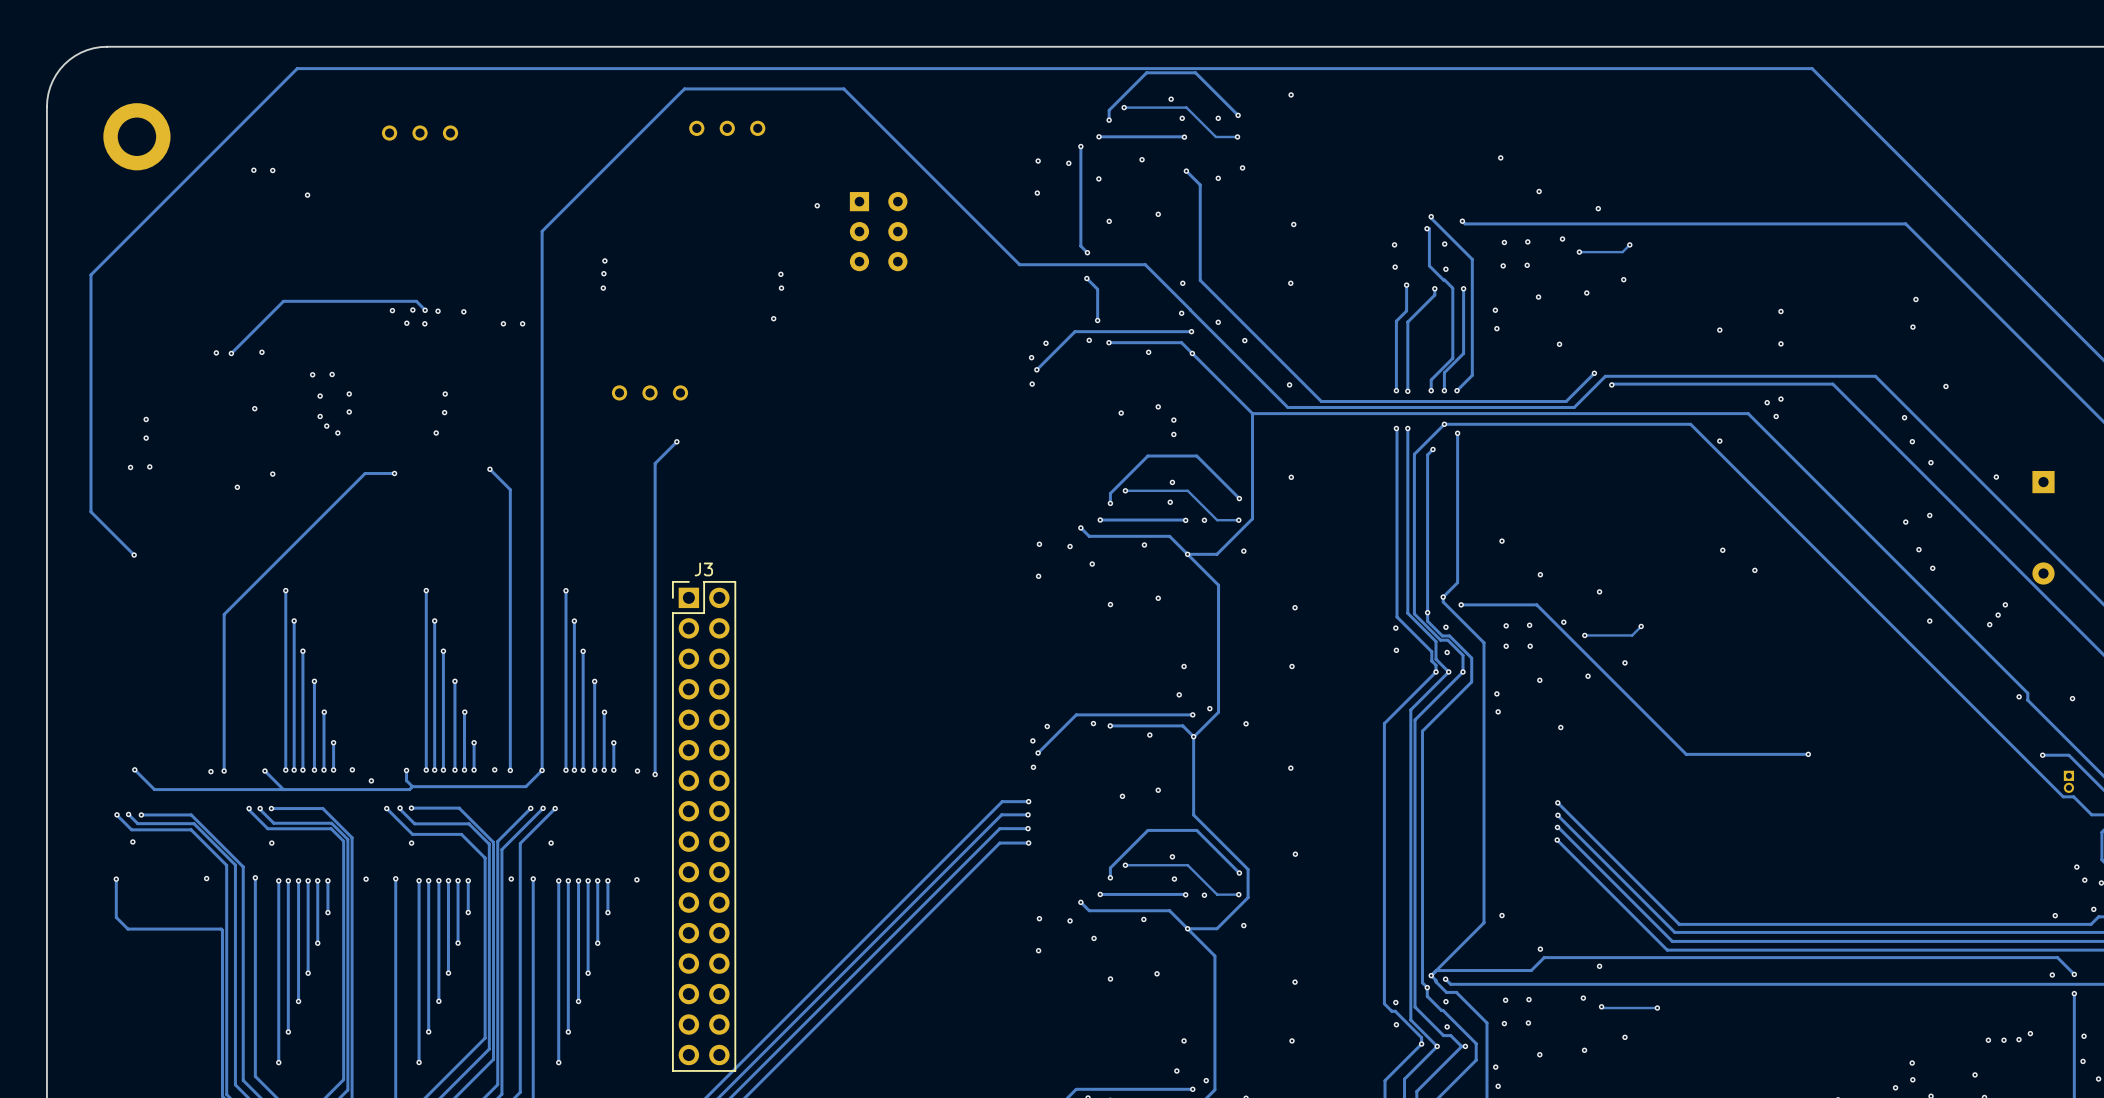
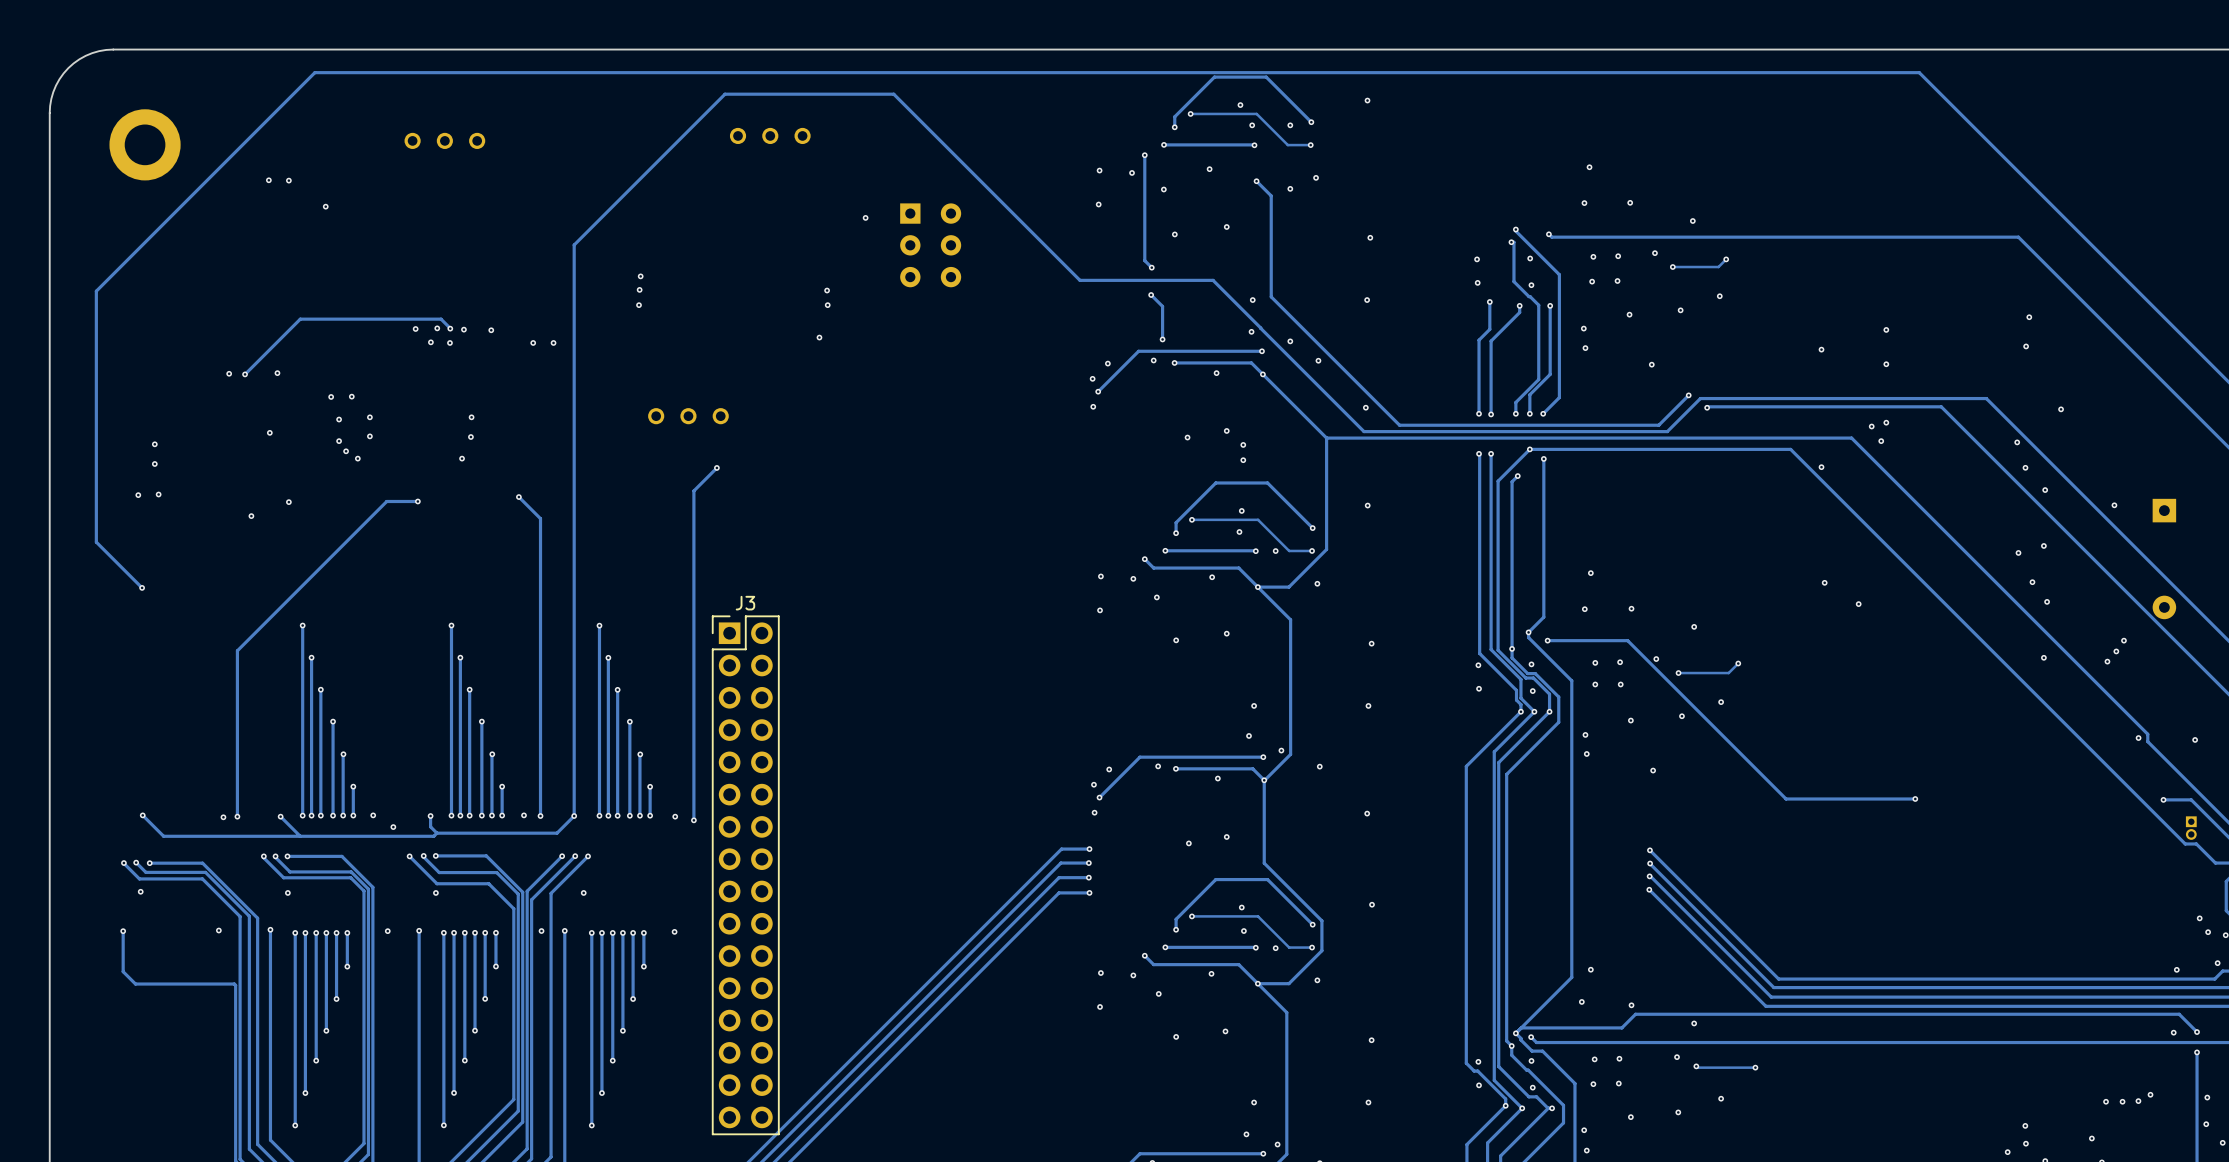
via: none -> (1584, 203)
via: none -> (1584, 609)
via: none -> (1581, 1001)

